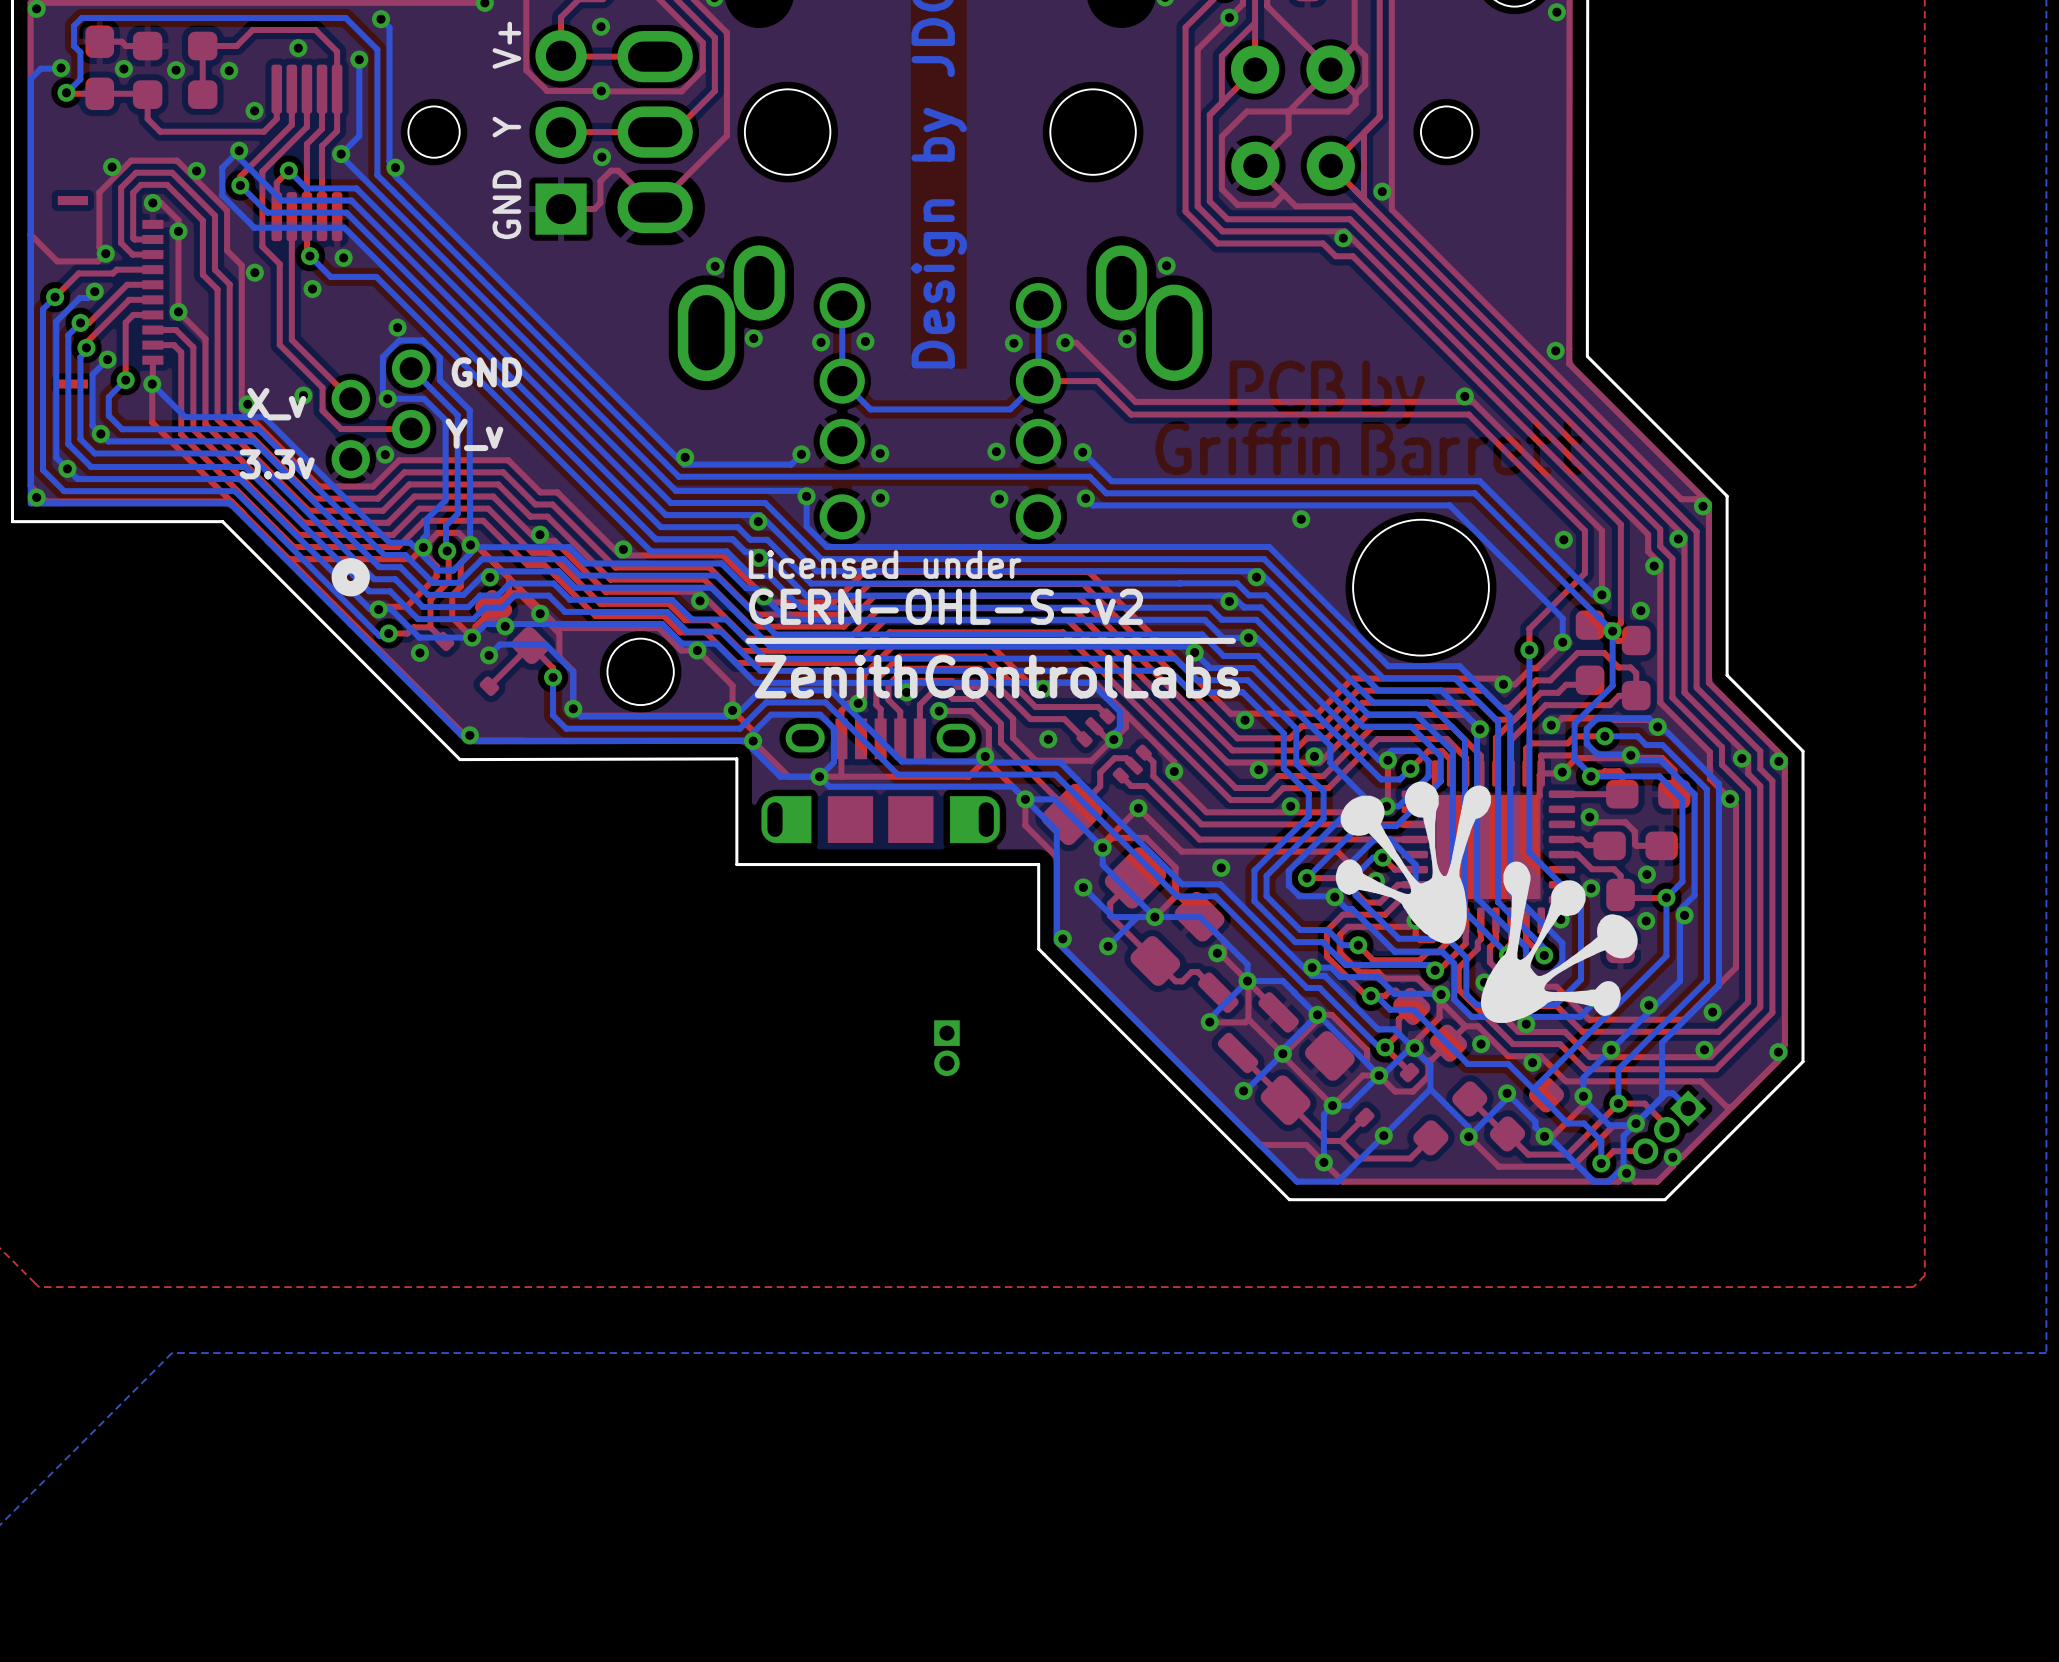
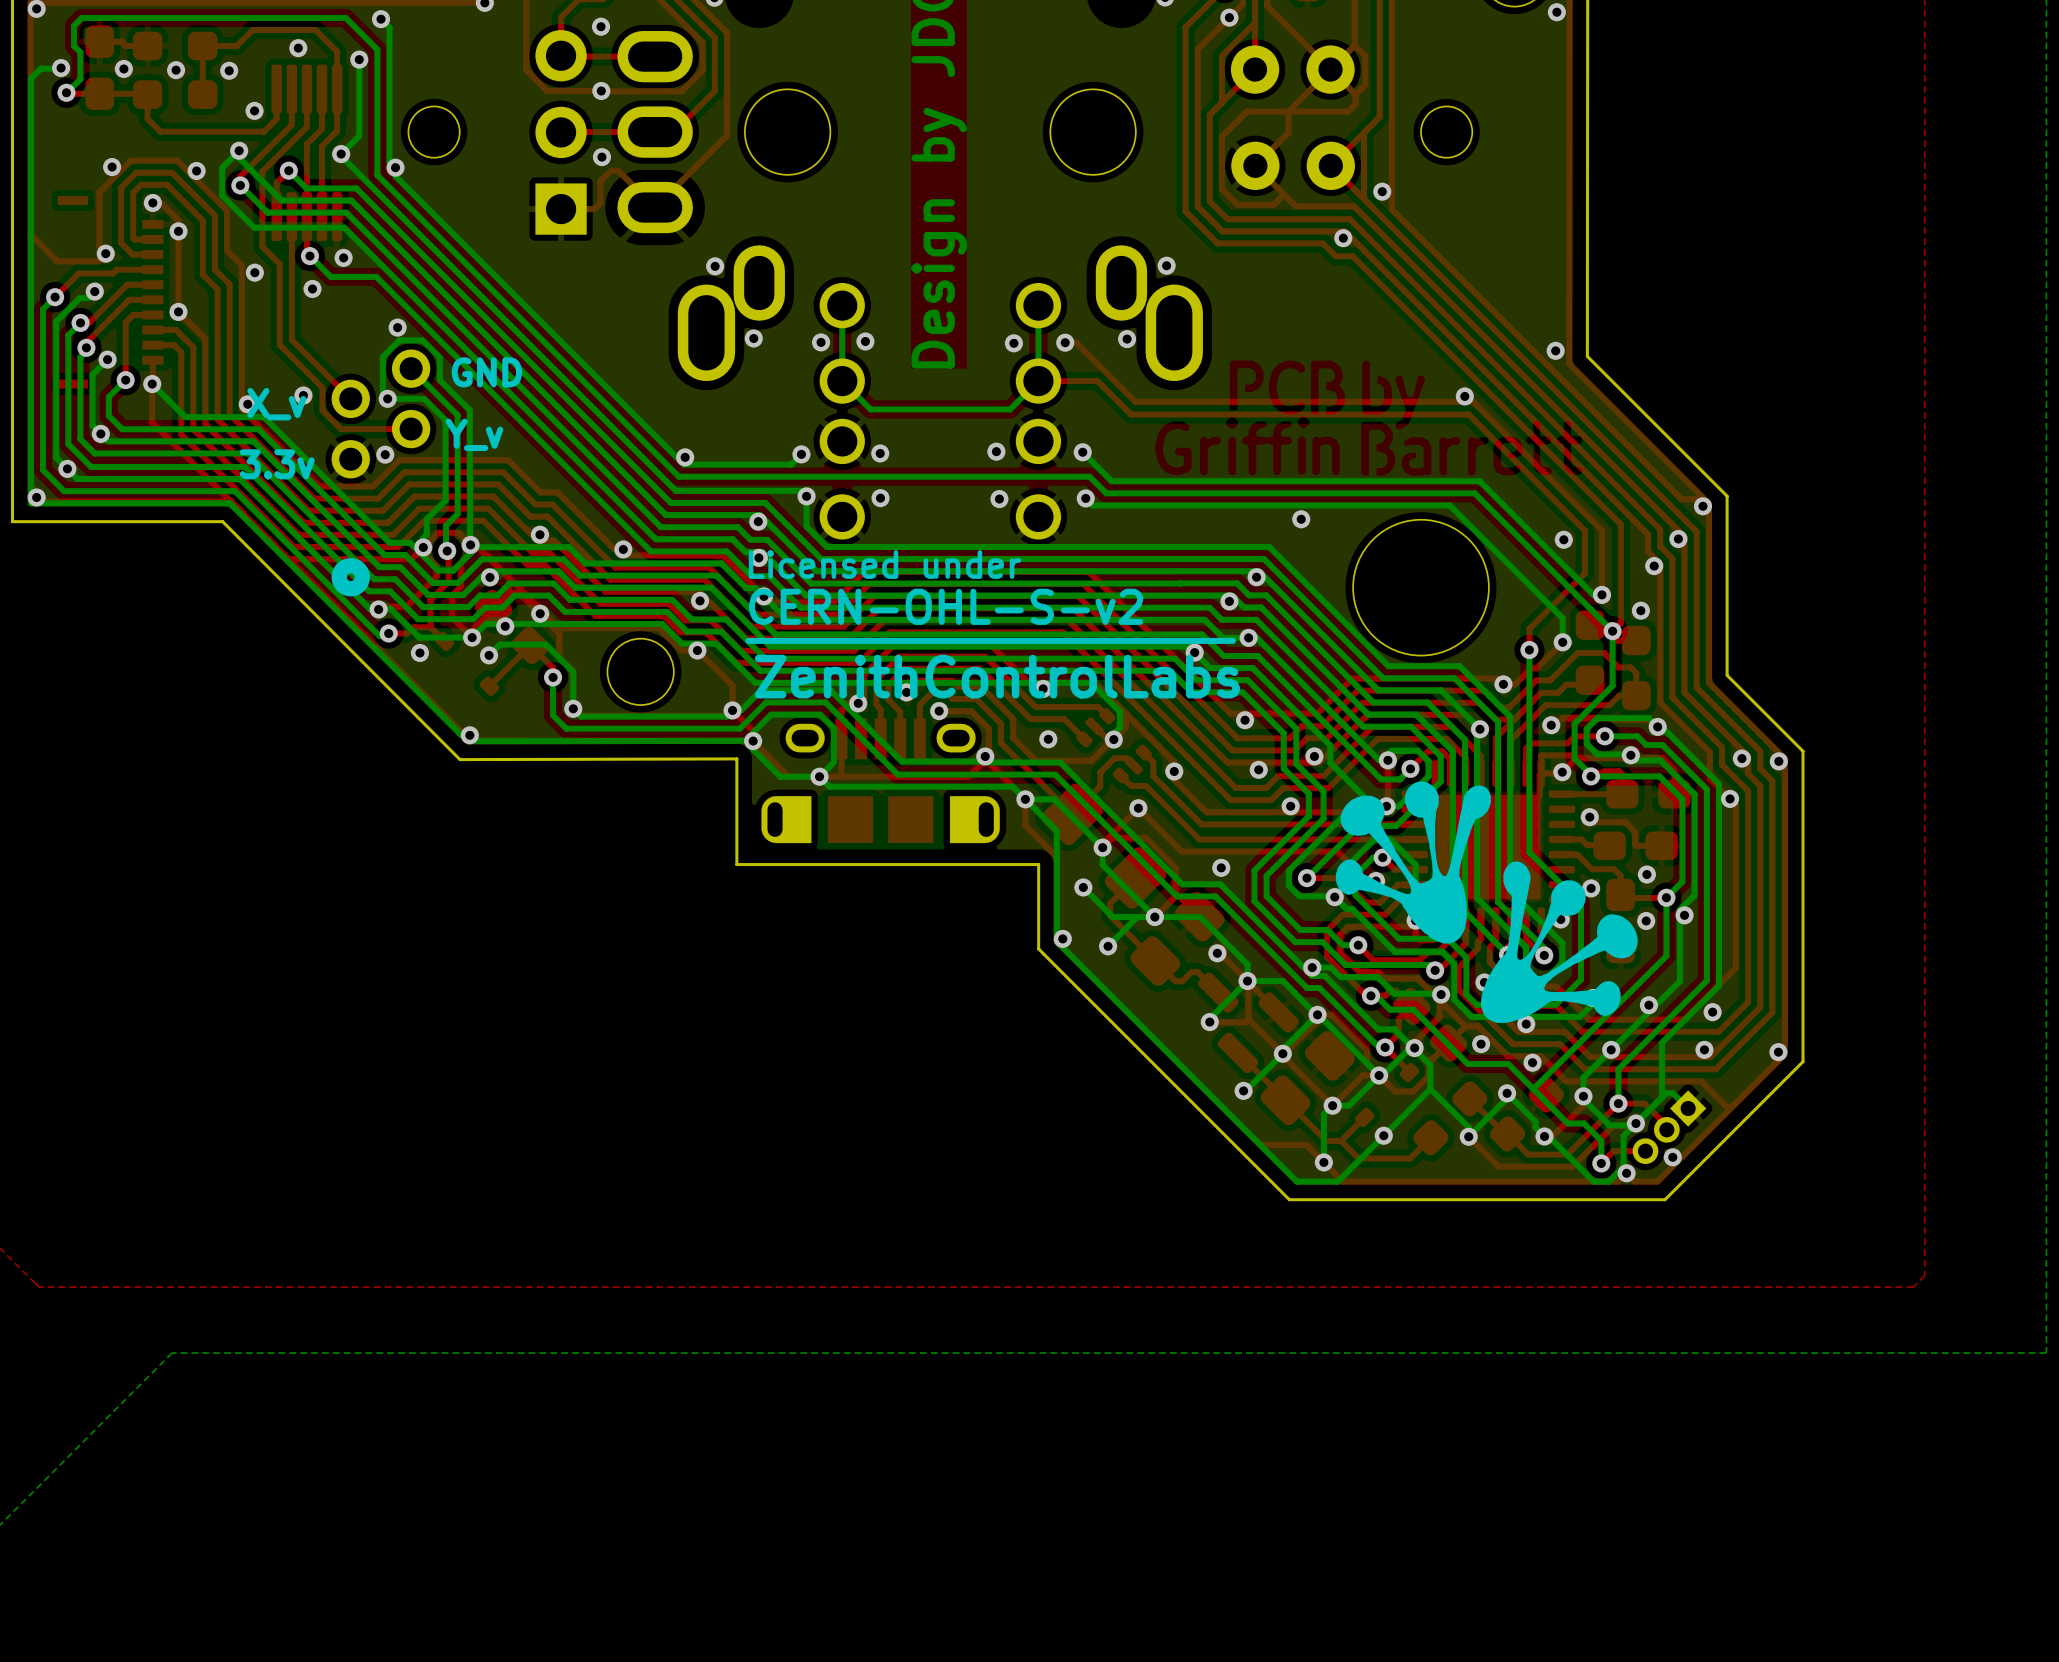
text: V+ (506, 45) -> none
text: Y (506, 127) -> none
text: GND (506, 204) -> none
part: (946, 1048) -> none

